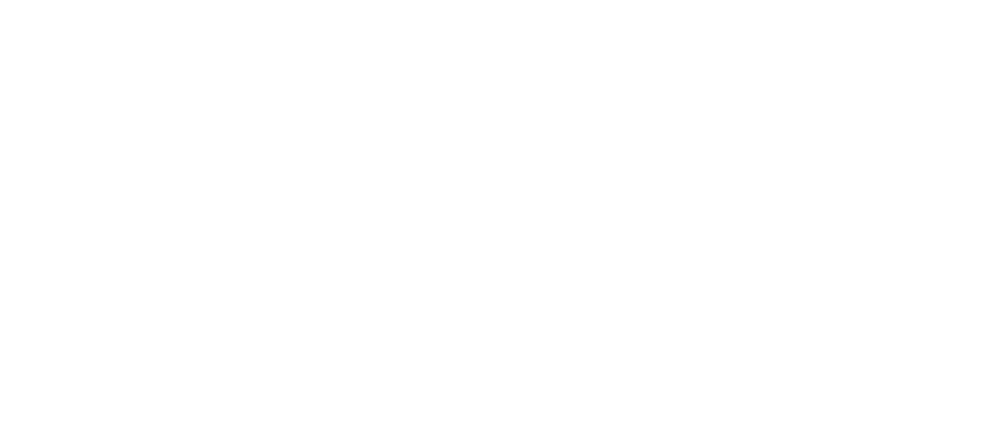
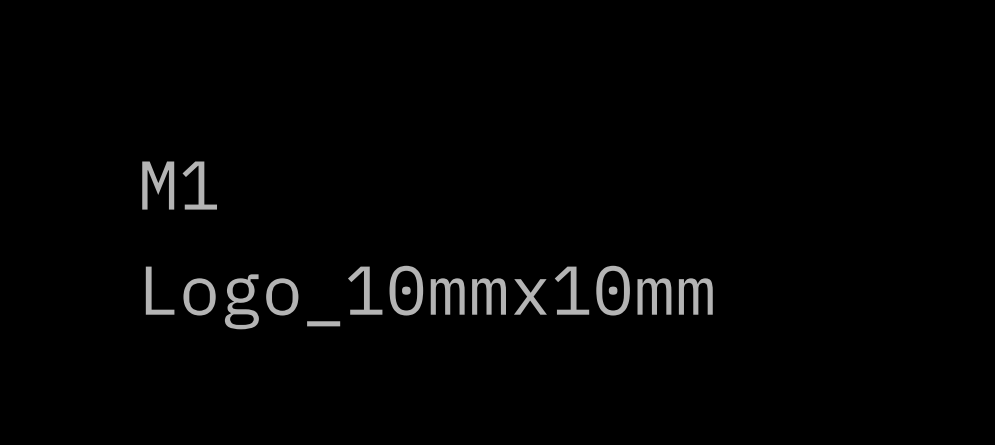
M1: none -> Logo_10mmx10mm (427, 245)

